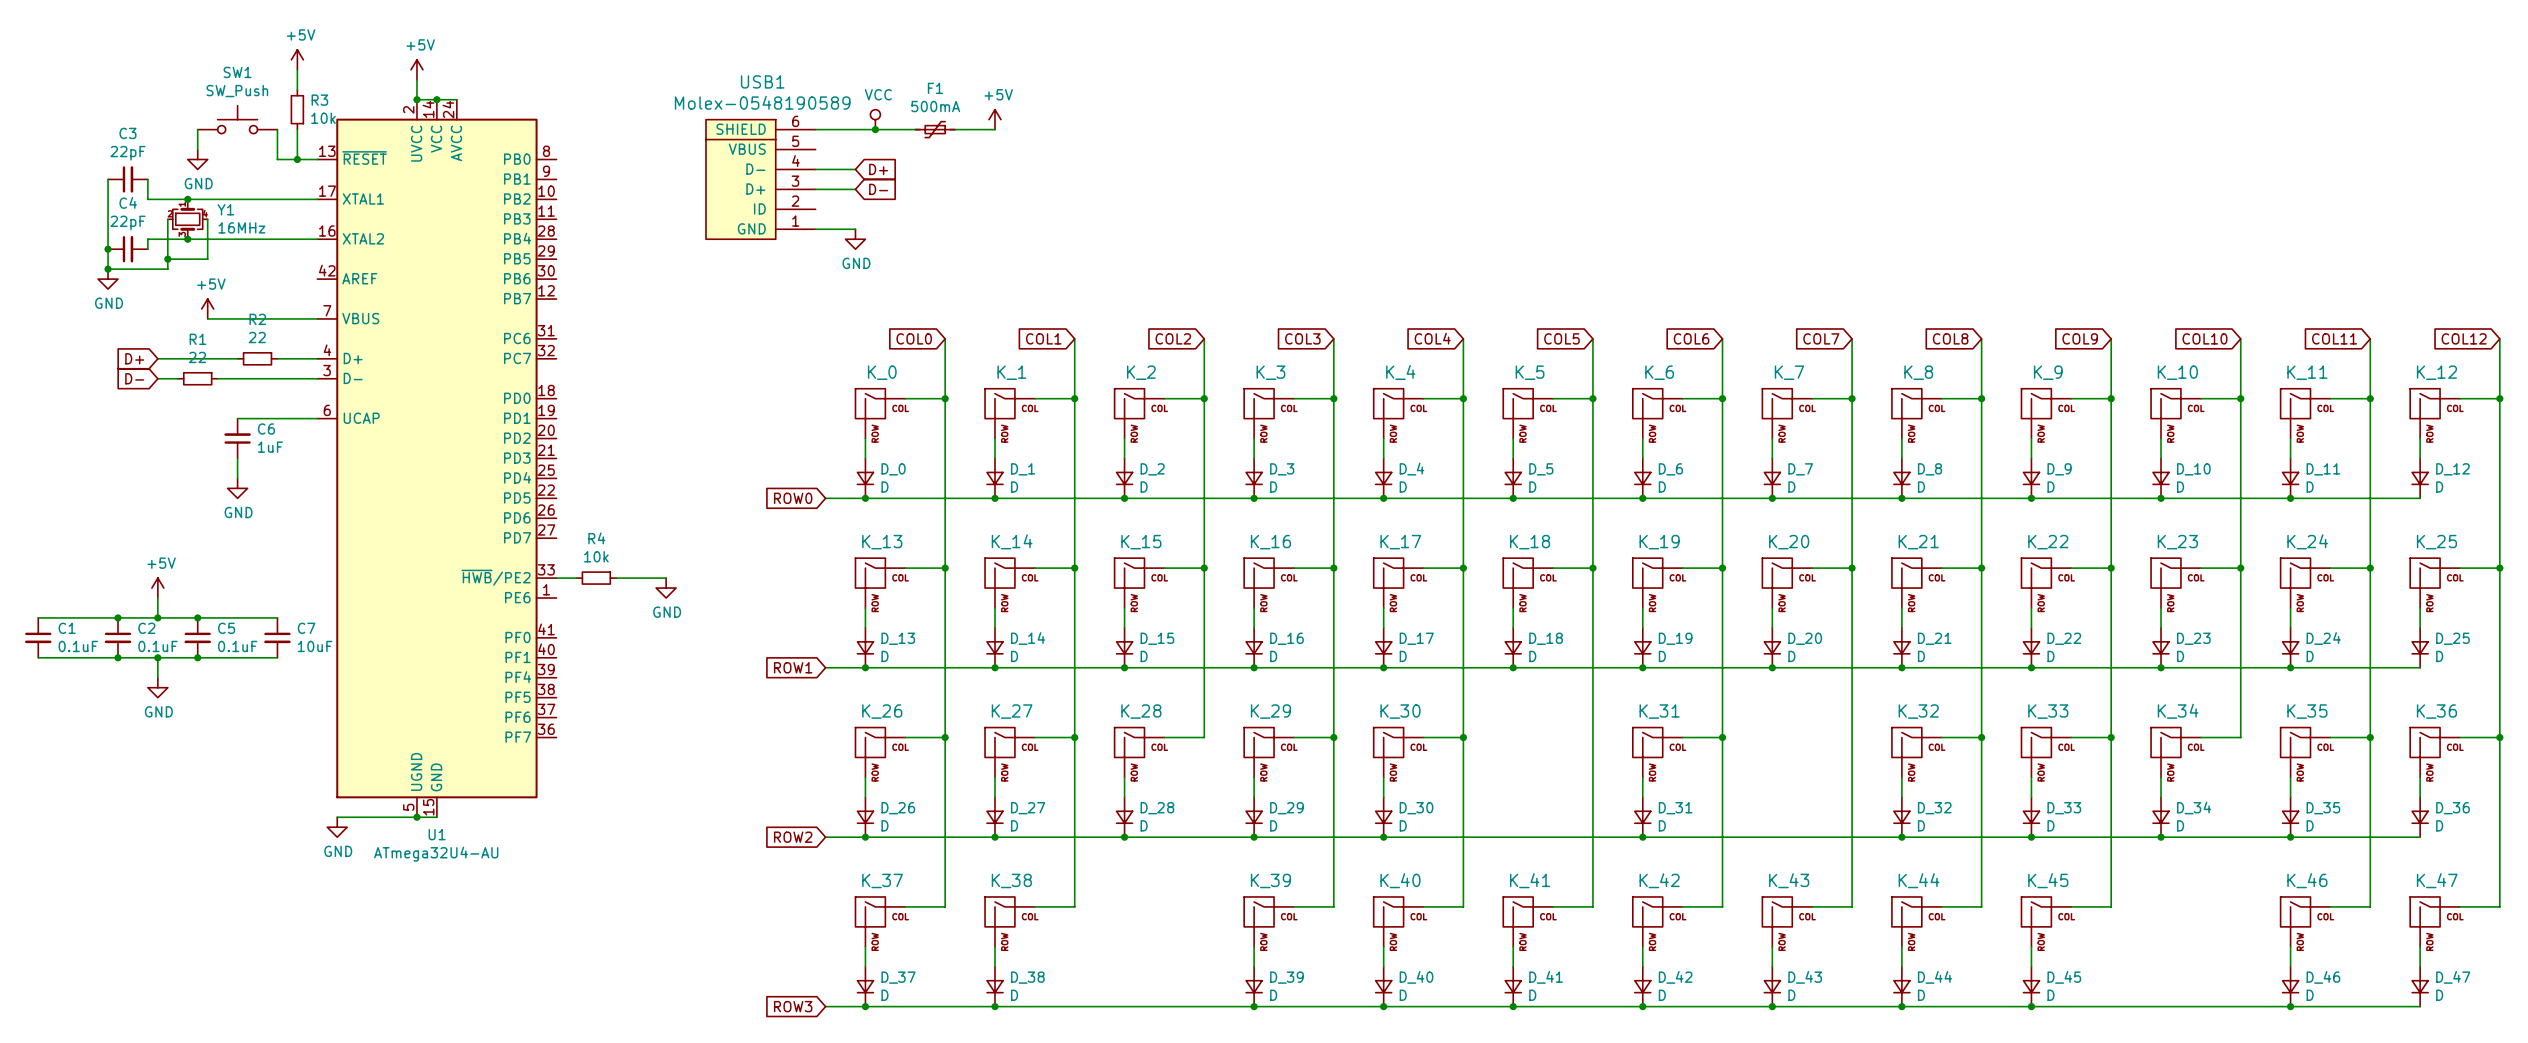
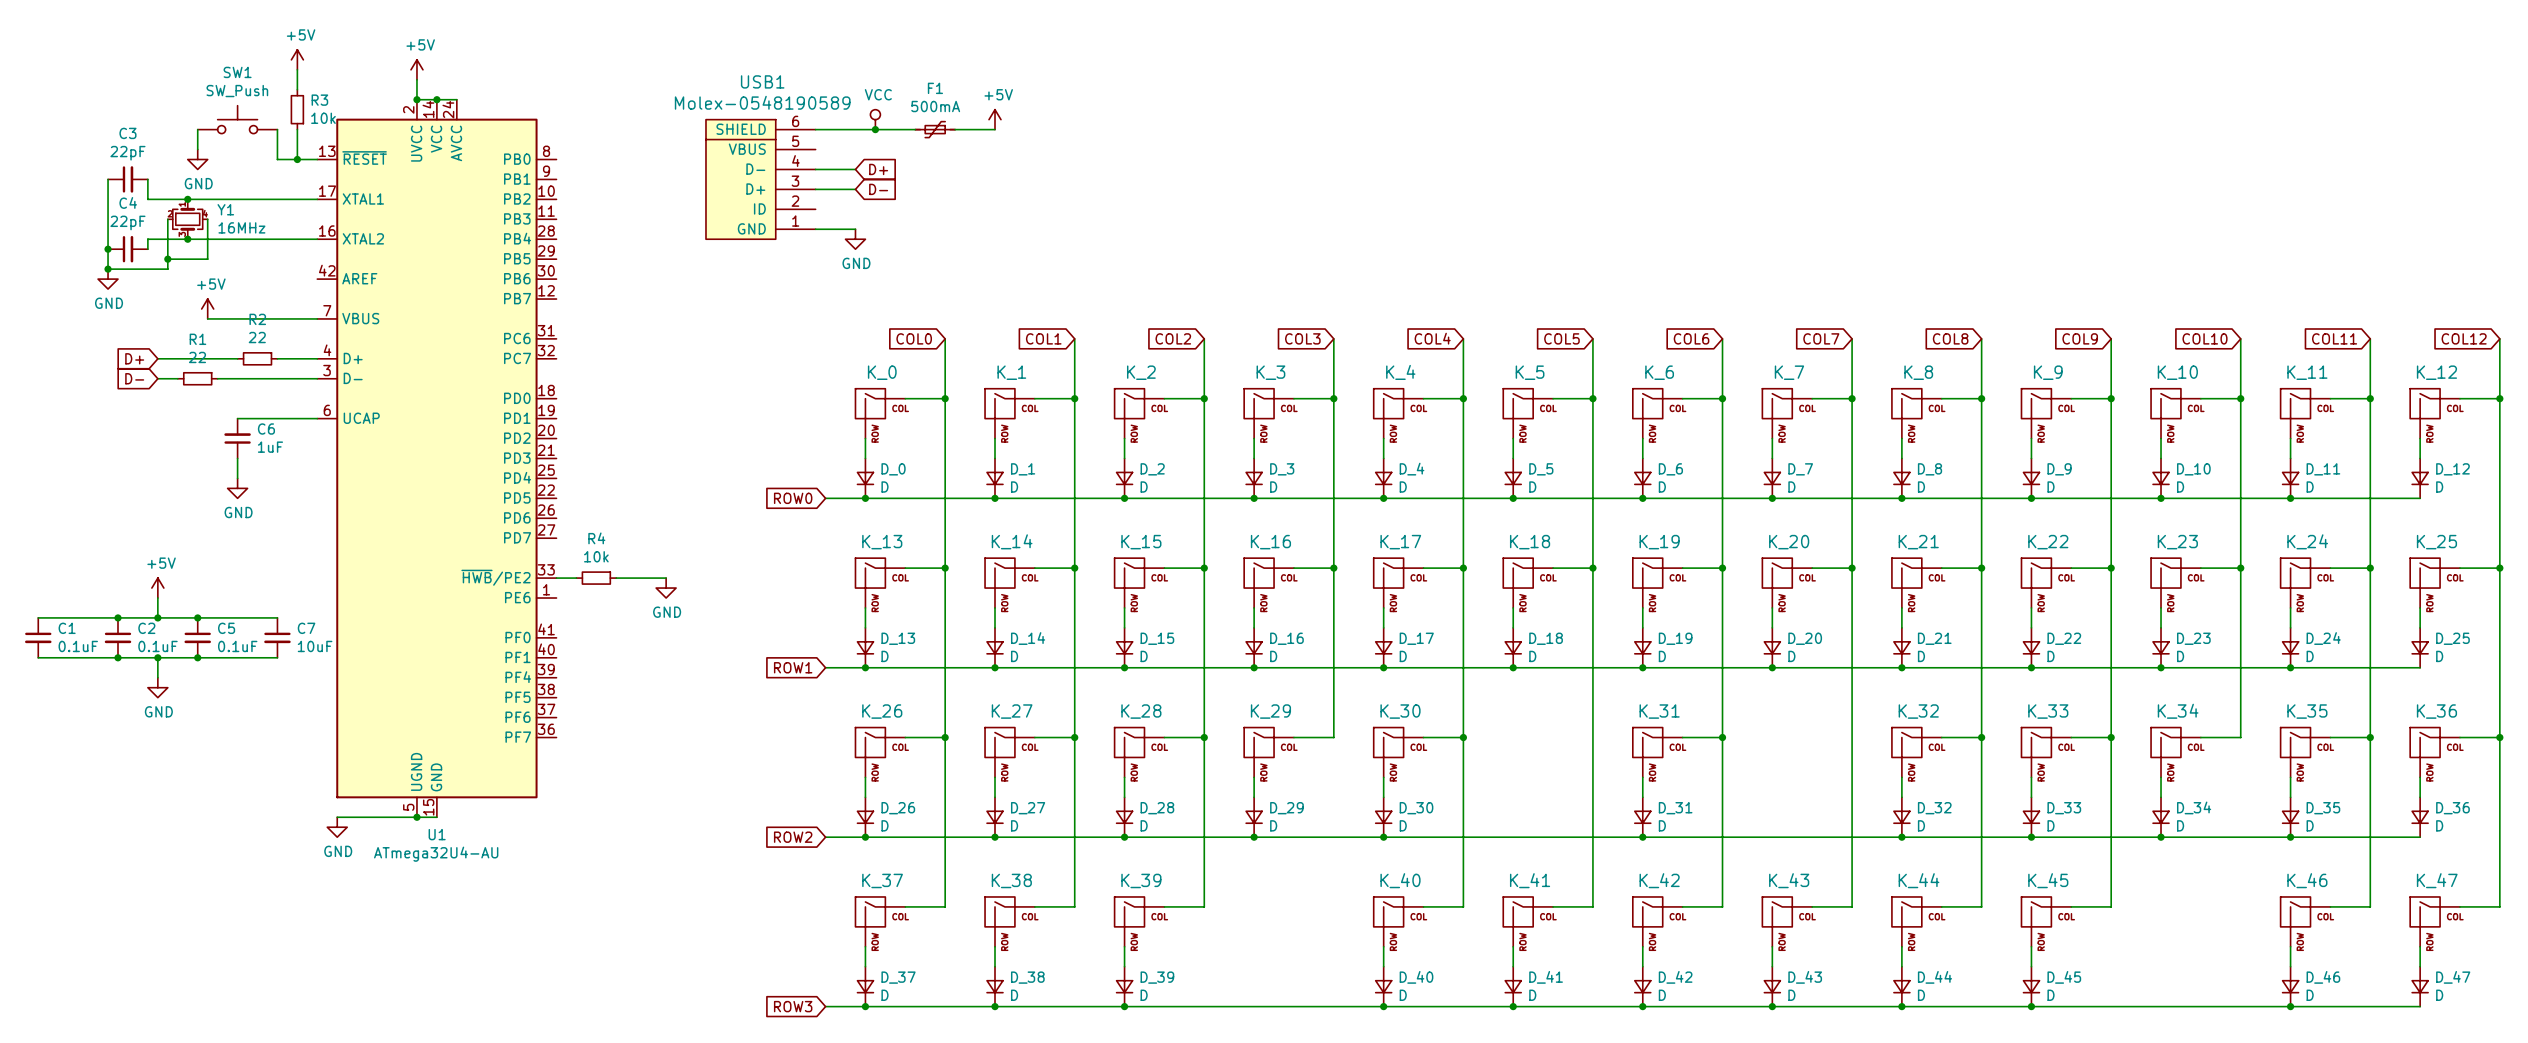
junction: none -> (1204, 737)
wire: (1333, 737) (1333, 906) (1293, 906) -> (1204, 737) (1204, 906) (1164, 906)
junction: (1333, 737) -> none
K_39 position: (1269, 921) -> (1139, 921)
wire: (1254, 946) (1254, 966) -> (1124, 946) (1124, 966)
D_39 position: (1254, 986) -> (1124, 986)
junction: none -> (1124, 1006)
junction: (1254, 1006) -> none

